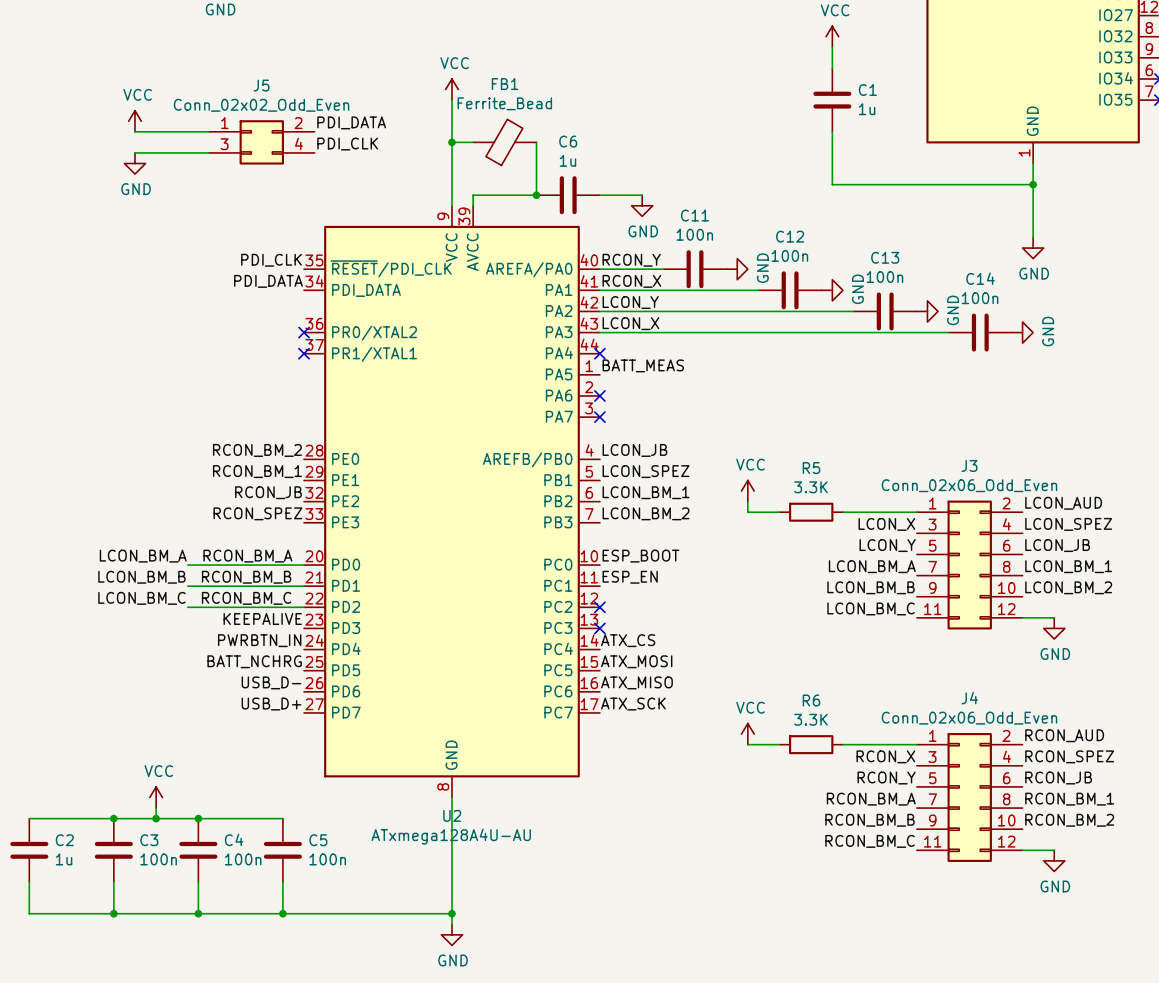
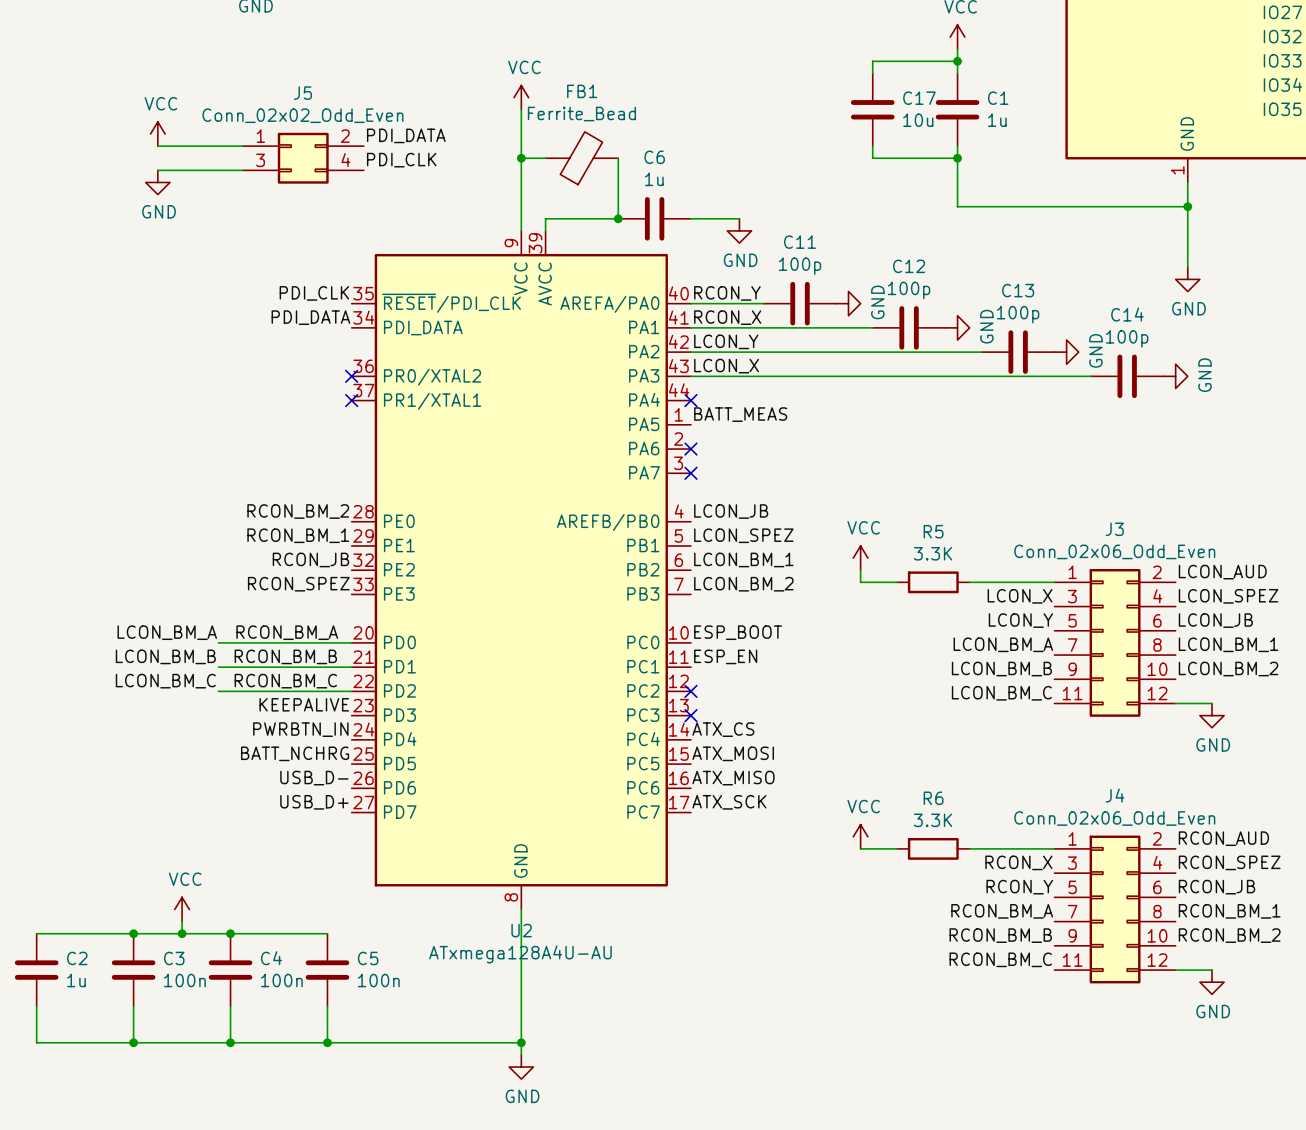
wire: none -> (957, 61) (872, 61) (872, 73)
junction: none -> (957, 61)
C17: none -> 10u (872, 109)
wire: none -> (872, 146) (872, 158) (957, 158)
junction: none -> (957, 158)
C11 value: 100n (694, 234) -> 100p (800, 266)
C12 value: 100n (789, 255) -> 100p (909, 290)
C13 value: 100n (884, 277) -> 100p (1018, 314)
C14 value: 100n (980, 298) -> 100p (1127, 338)

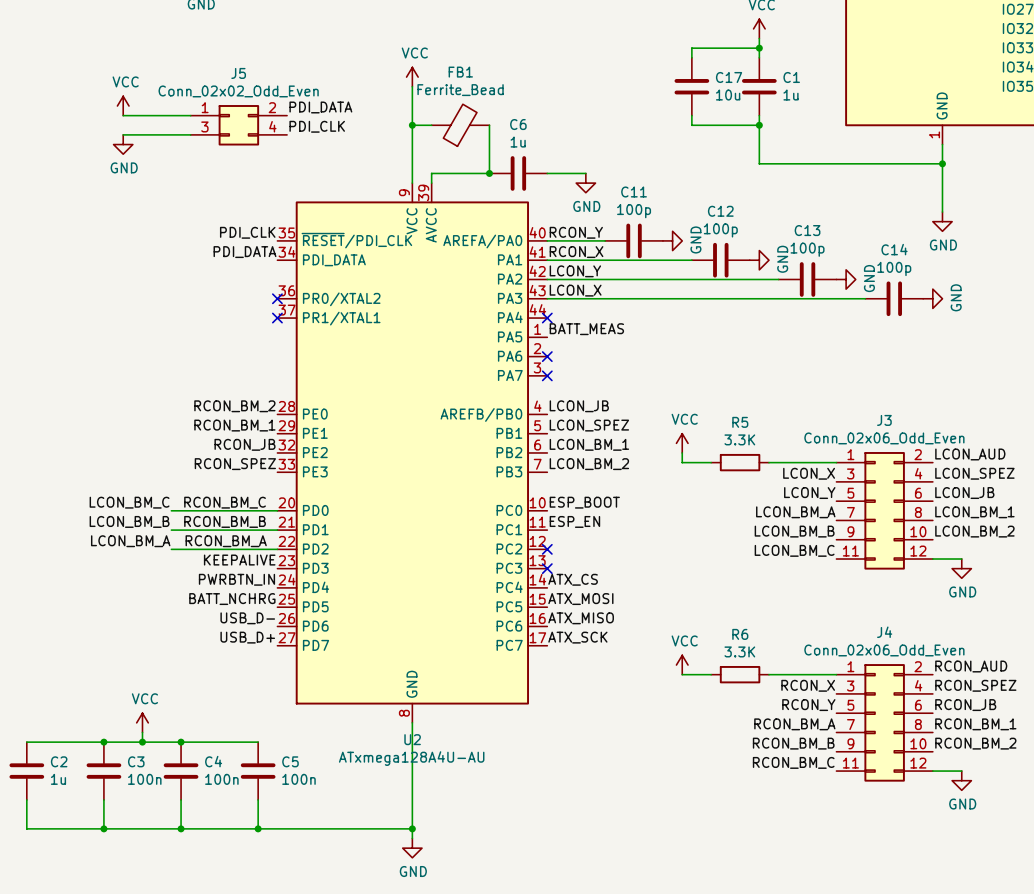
label: LCON_BM_A (167, 632) -> LCON_BM_C (129, 502)
label: RCON_BM_A (287, 632) -> RCON_BM_C (225, 502)
label: LCON_BM_C (165, 681) -> LCON_BM_A (130, 541)
label: RCON_BM_C (285, 681) -> RCON_BM_A (226, 541)

